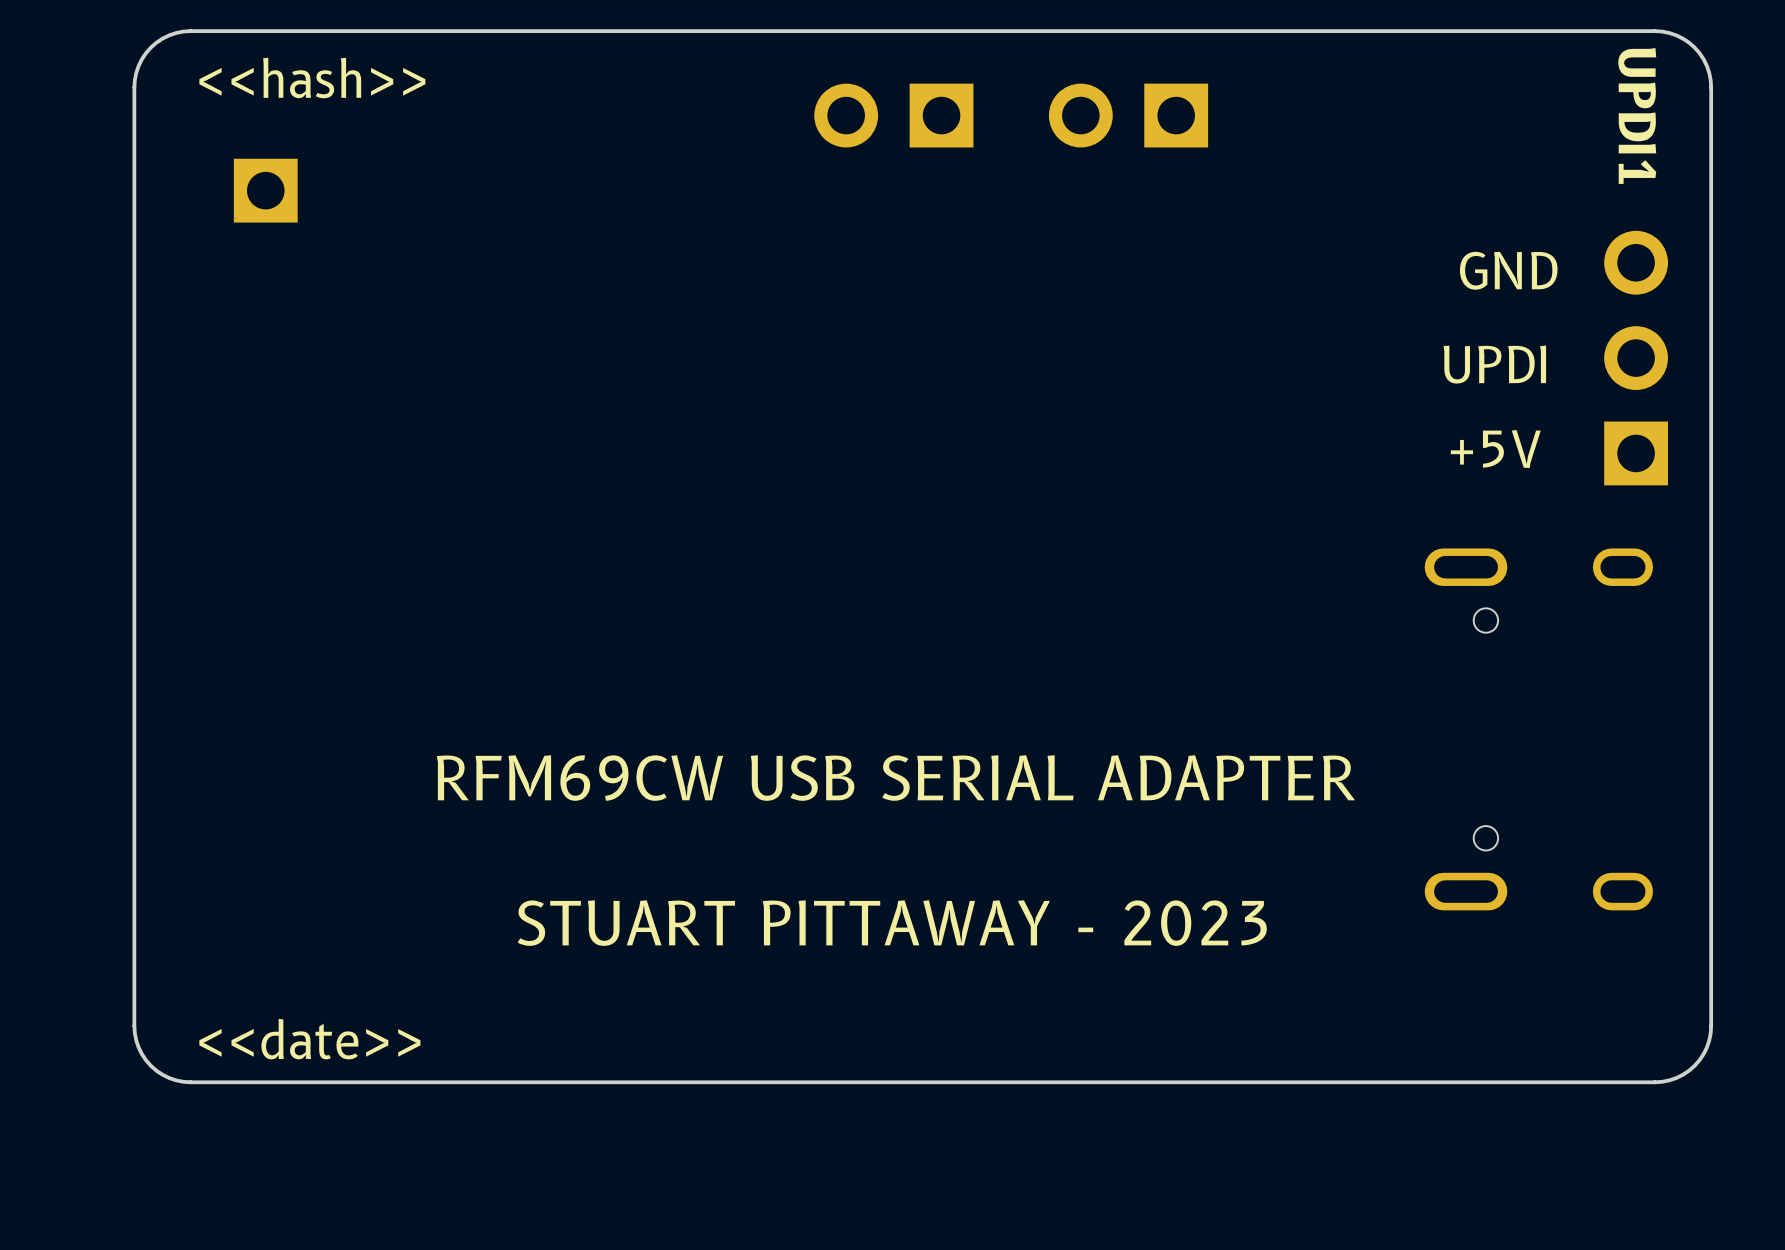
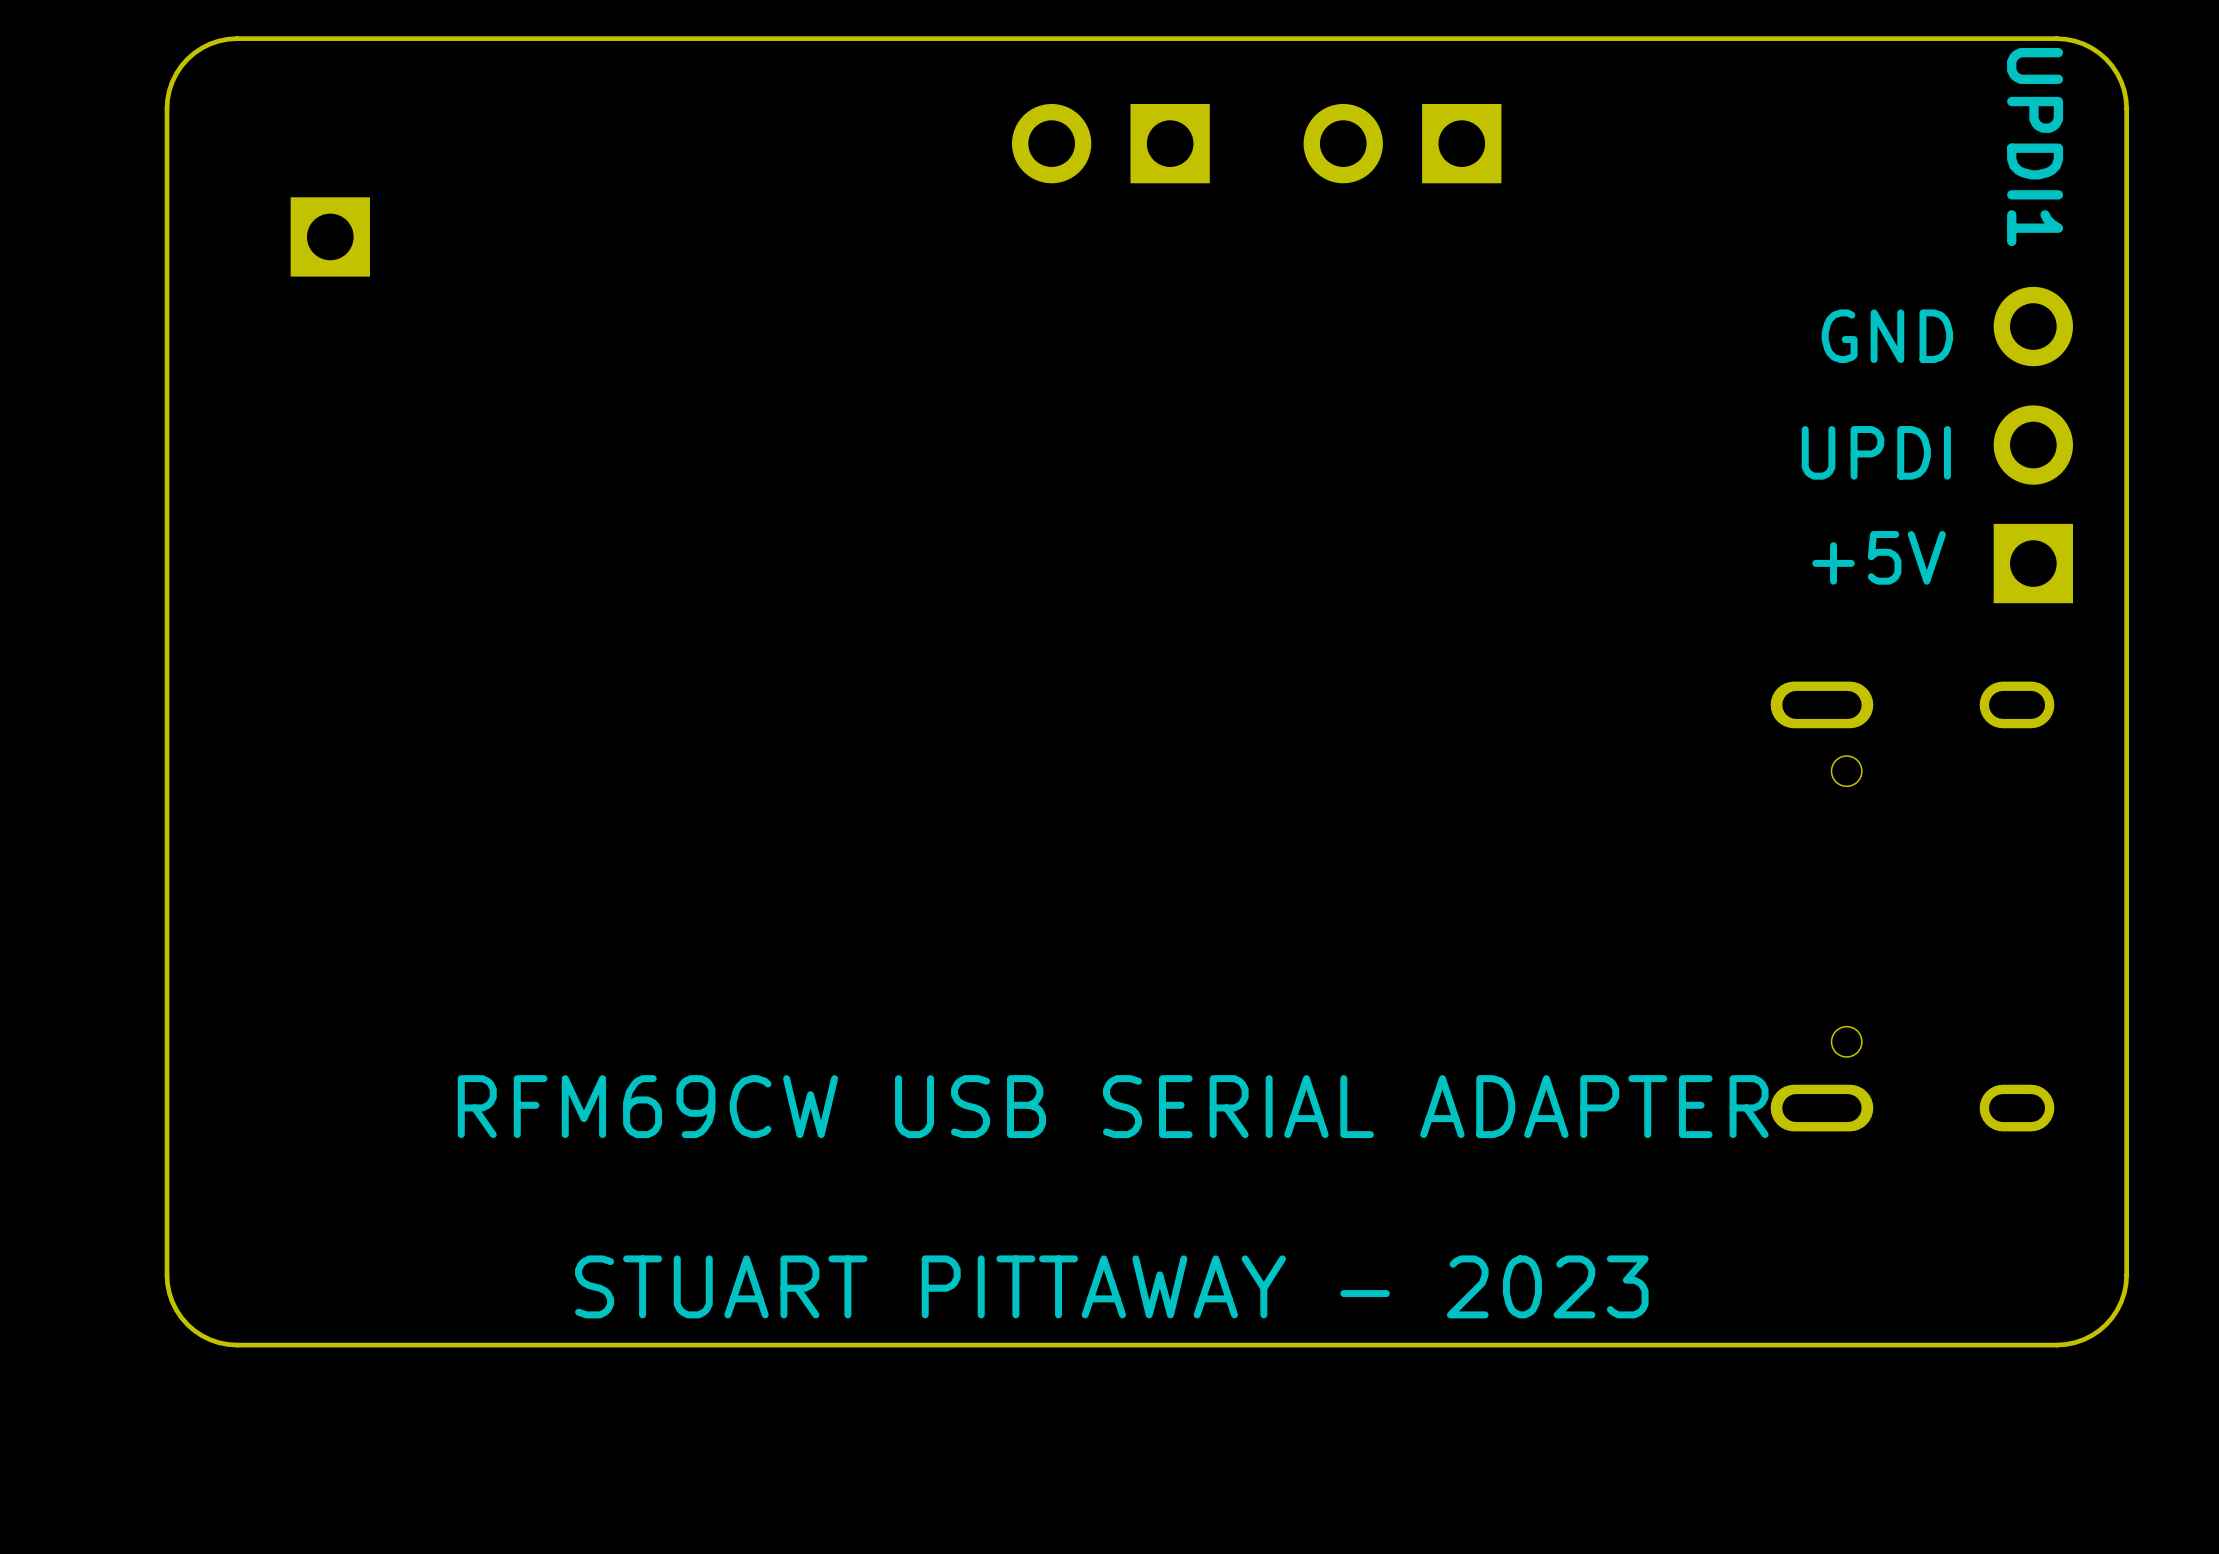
text: <<hash>> (312, 78) -> none
text: RFM69CW USB SERIAL ADAPTER (895, 778) -> none
text: STUART PITTAWAY - 2023 (892, 923) -> RFM69CW USB SERIAL ADAPTER (1113, 1106)
text: none -> STUART PITTAWAY - 2023 (1111, 1286)
text: <<date>> (309, 1039) -> none

